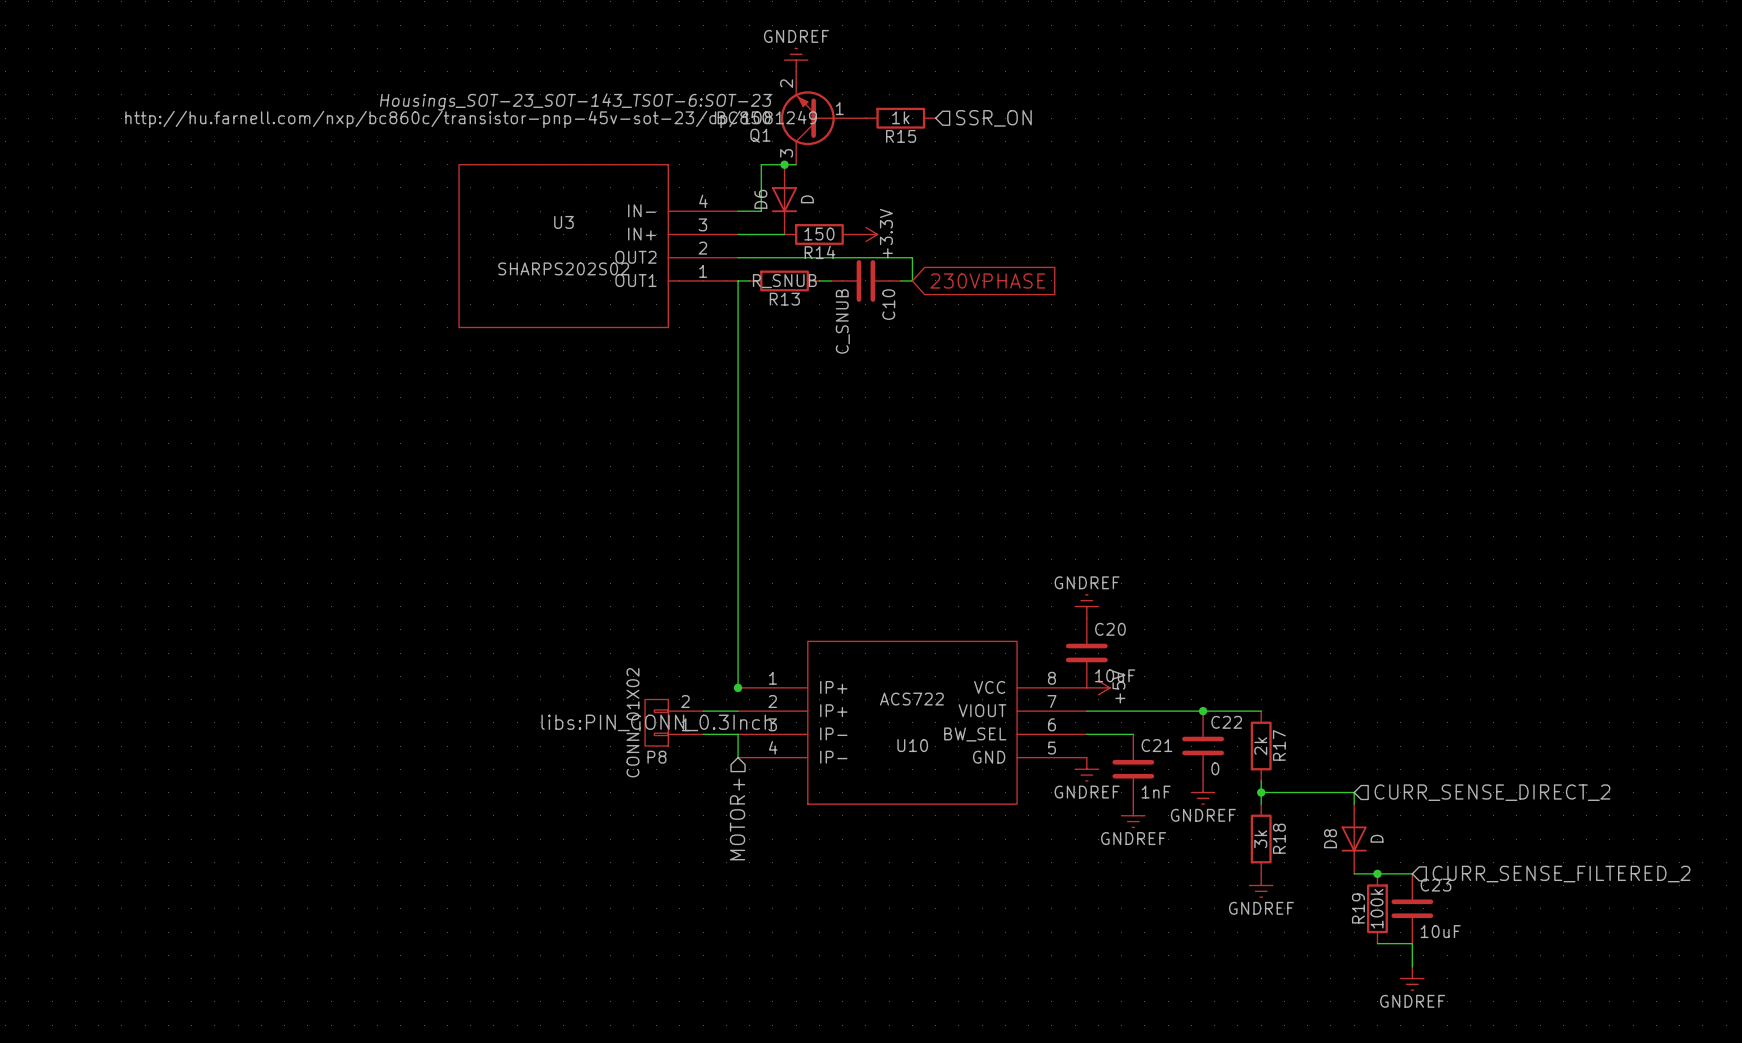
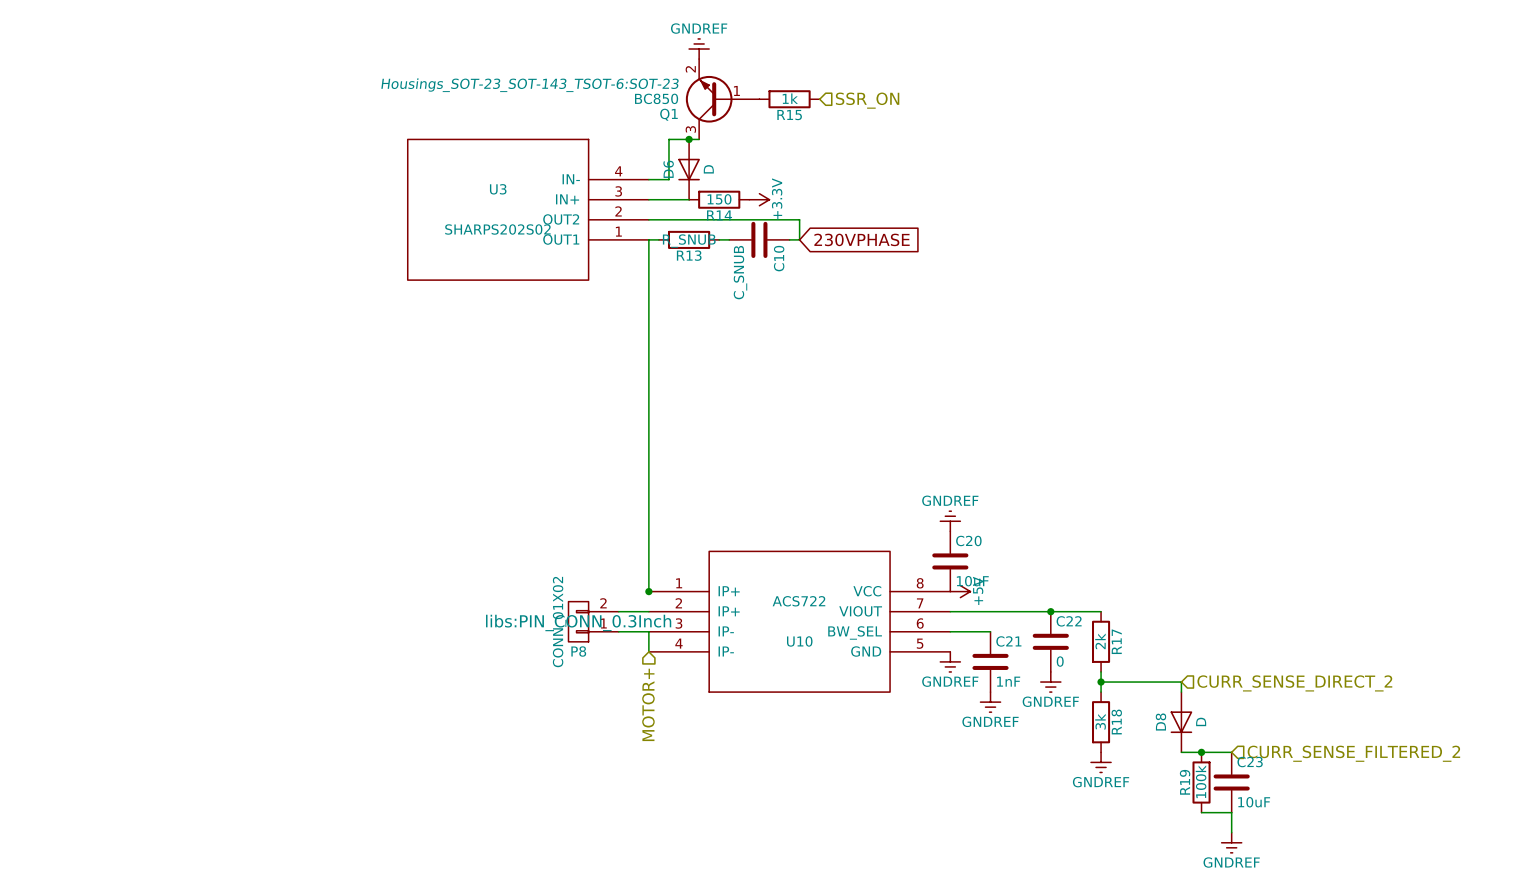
Q1 text: http://hu.farnell.com/nxp/bc860c/transistor-pnp-45v-sot-23/dp/1081249 (471, 119) -> none

